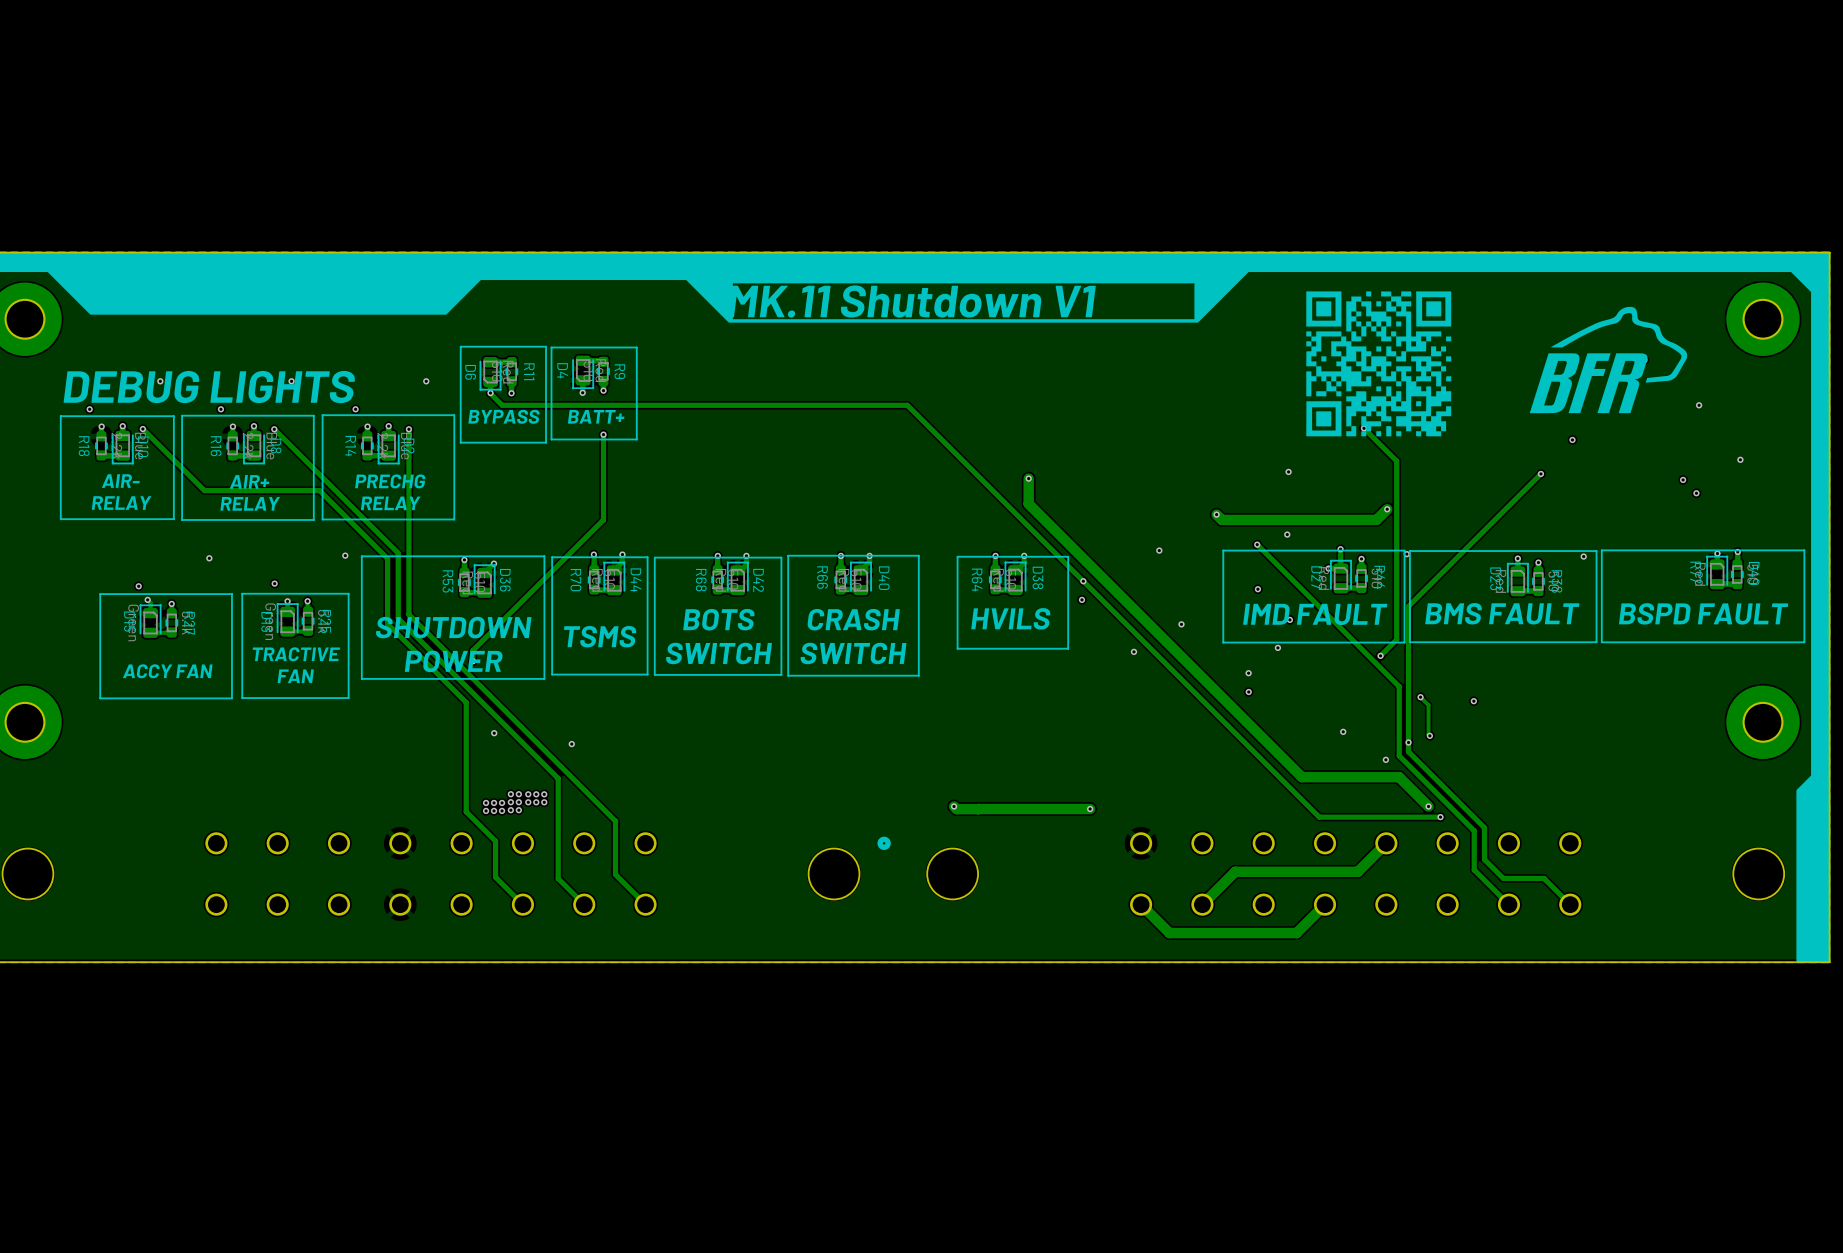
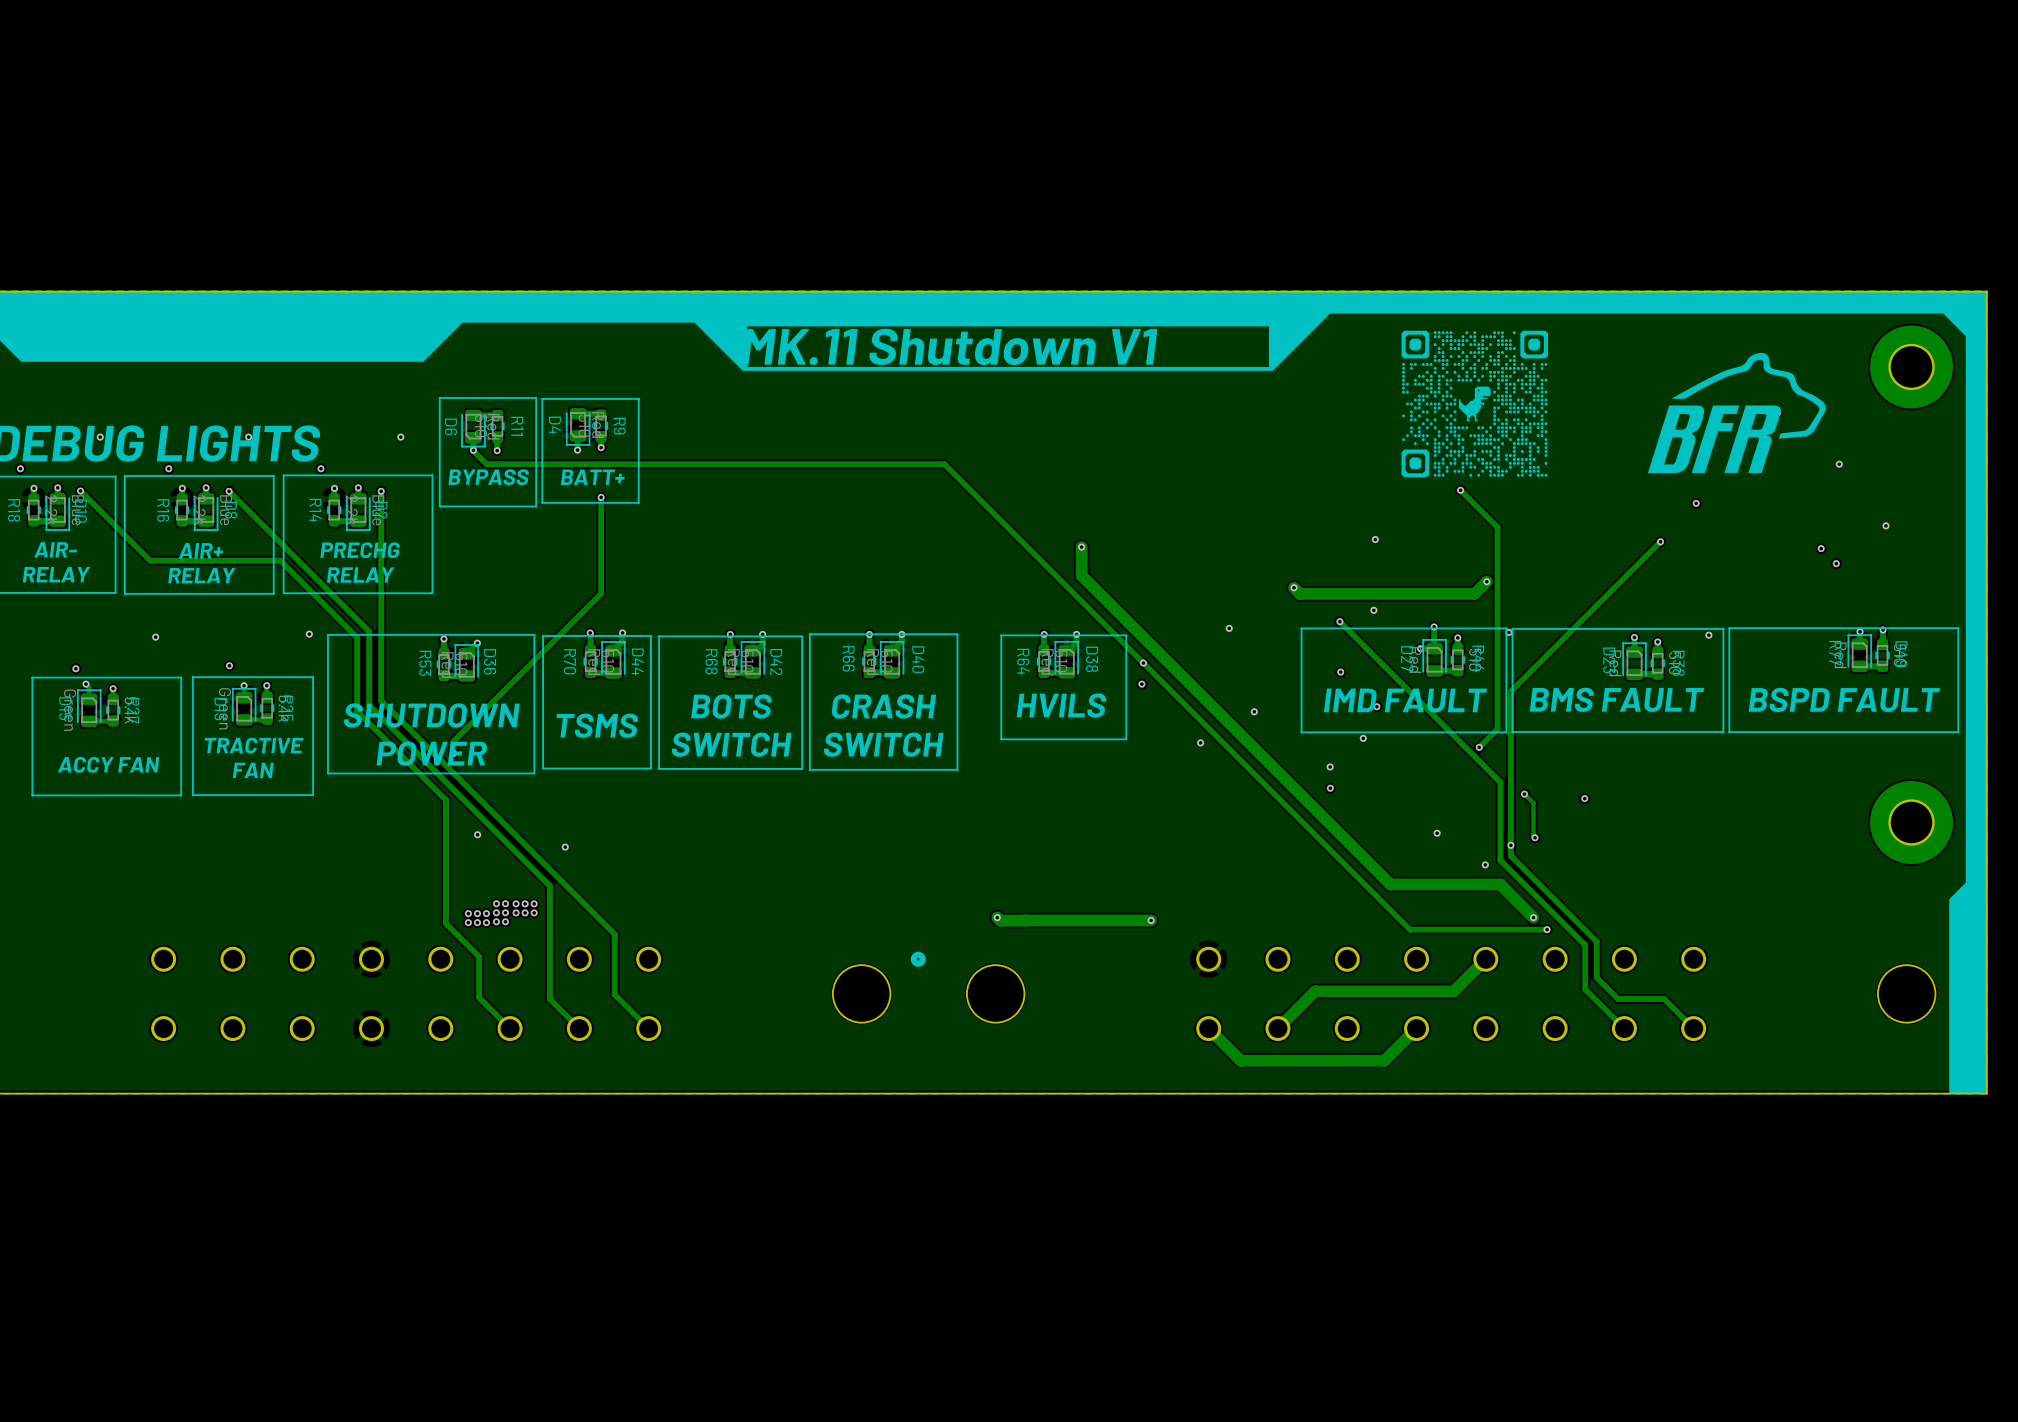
drawing: none -> [1401, 330, 1549, 478]
drawing: [1306, 291, 1452, 437] -> none

